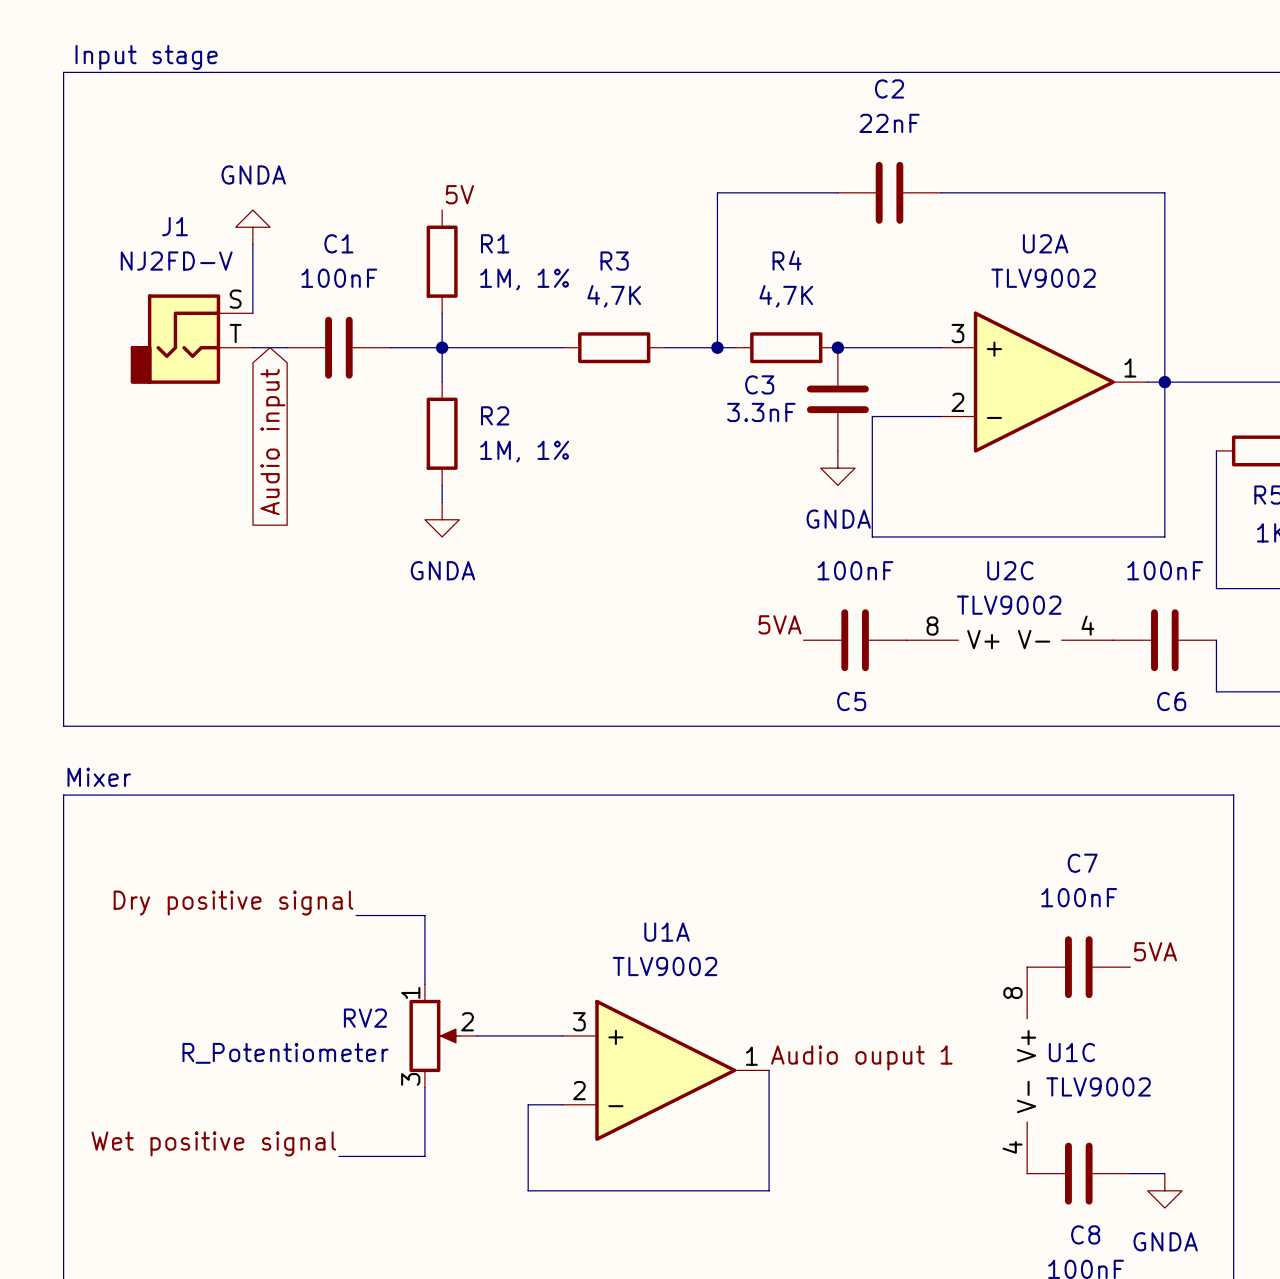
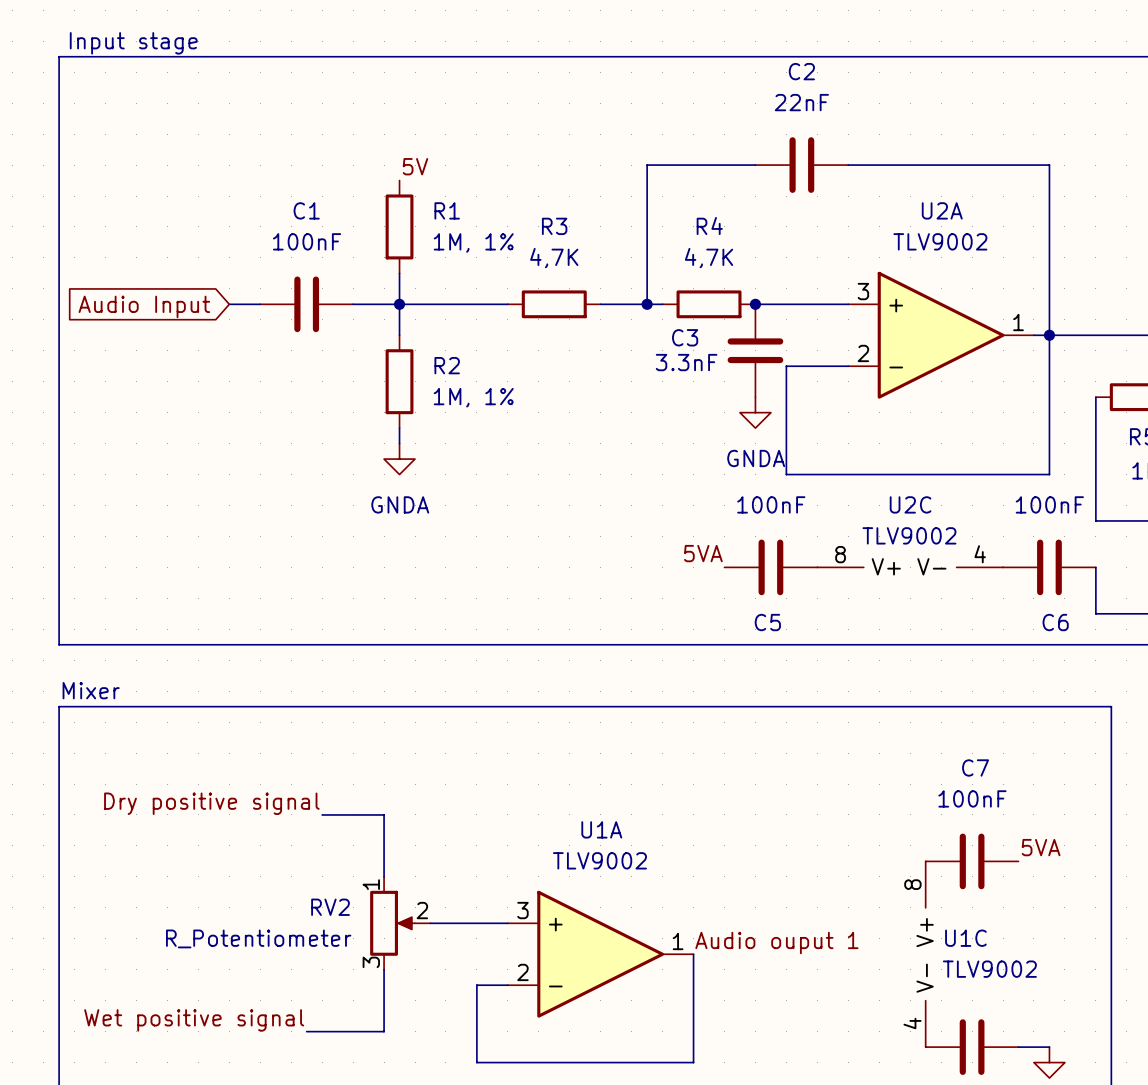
power symbol: GNDA (252, 227) -> none
wire: (252, 244) (252, 313) -> none
J1: NJ2FD-V (191, 339) -> none
global label: Audio input (272, 442) -> Audio Input (144, 306)

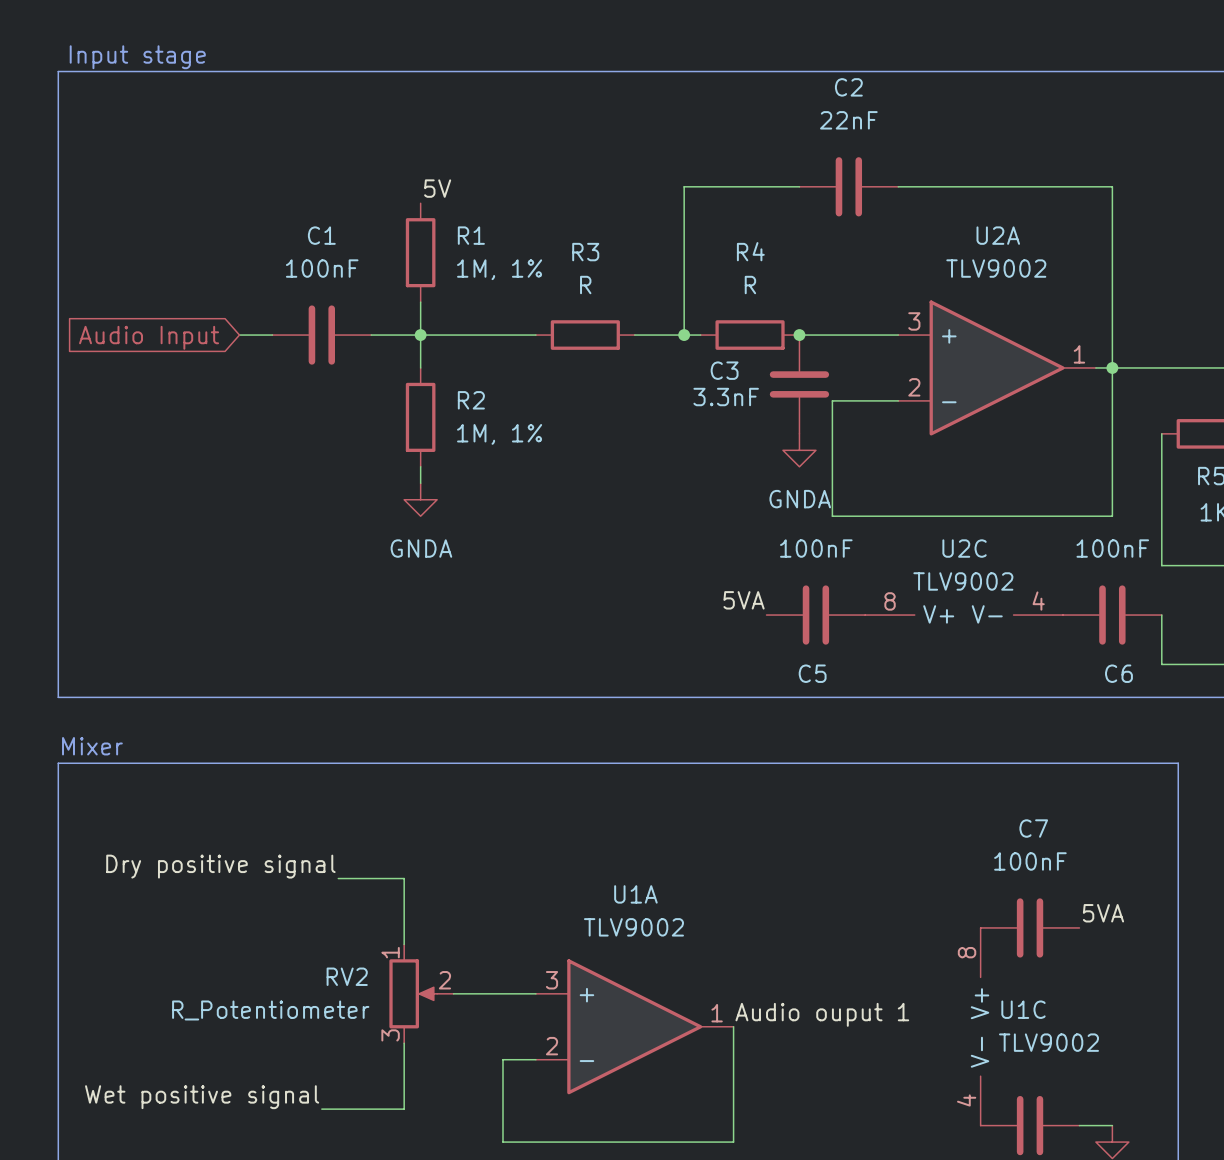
R3 value: 4,7K (554, 258) -> R (585, 285)
R4 value: 4,7K (709, 258) -> R (750, 285)

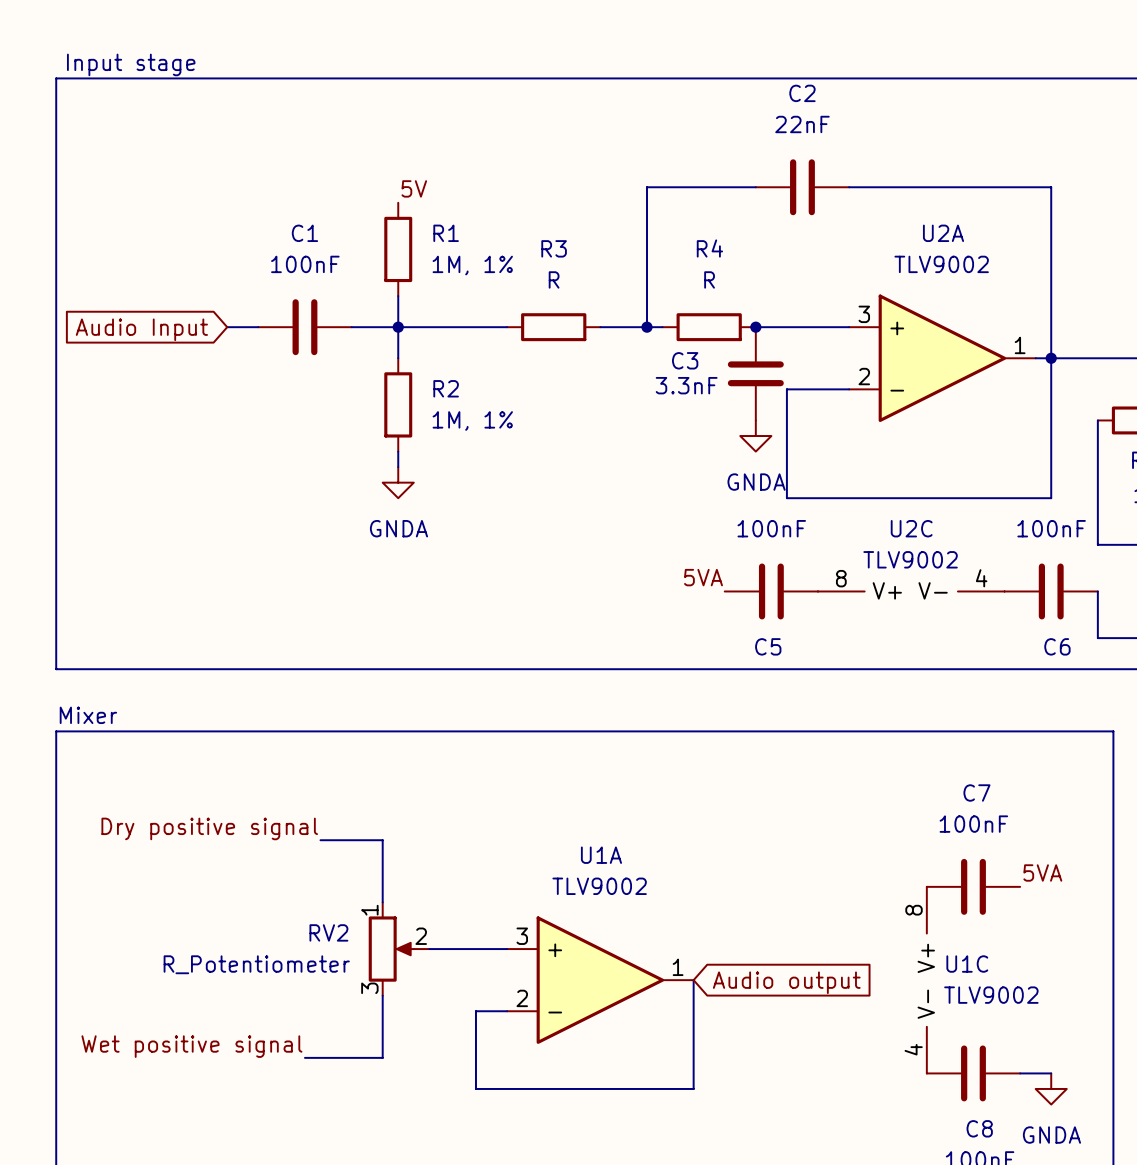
label: Audio ouput 1 (822, 1014) -> none
global label: none -> Audio output (786, 982)

